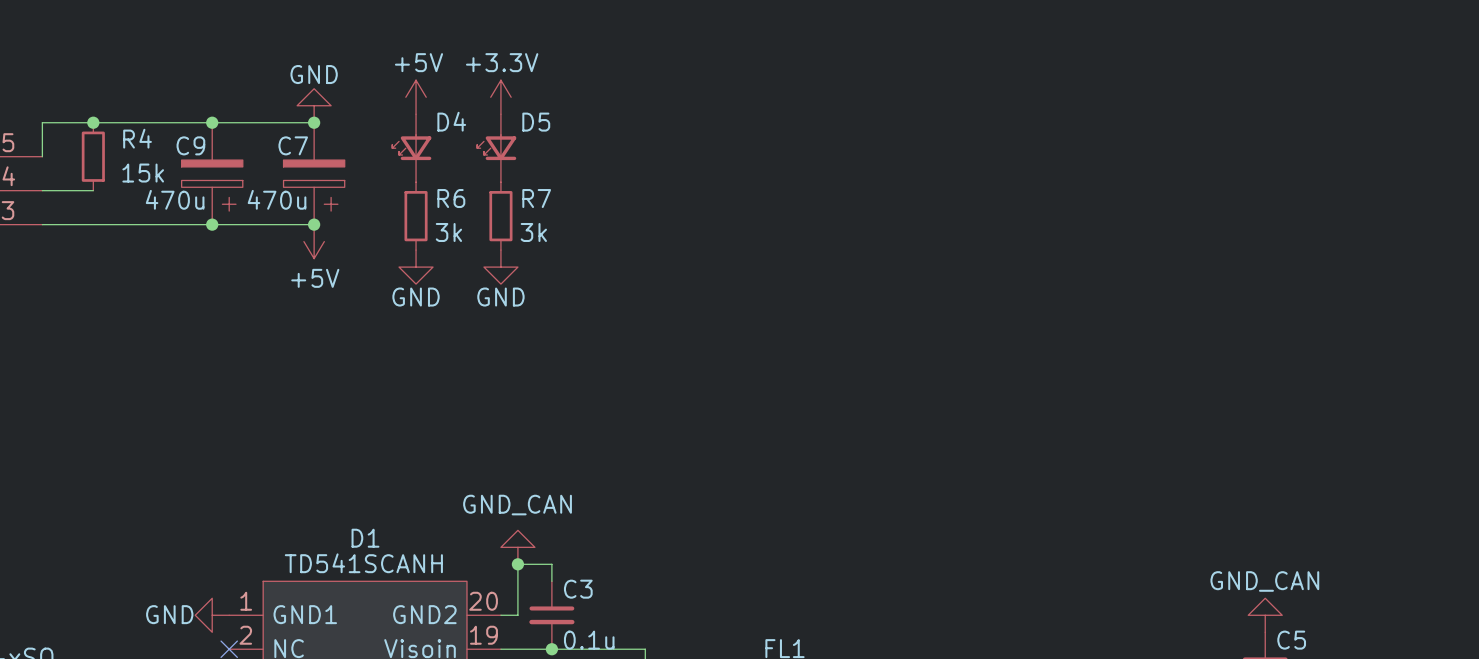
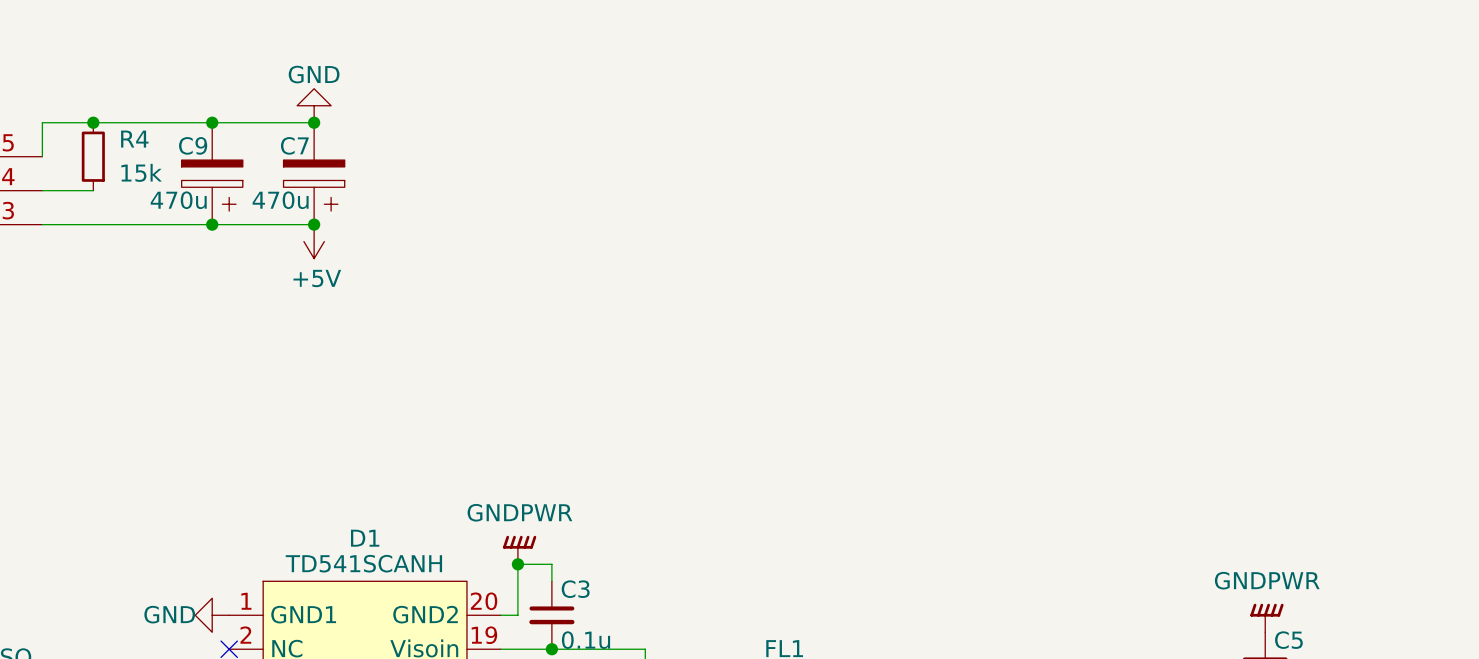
power symbol: +5V (416, 97) -> none
power symbol: +3.3V (500, 97) -> none
D4: (411, 148) -> none
D5: (496, 148) -> none
R6: 3k (416, 216) -> none
R7: 3k (500, 216) -> none
power symbol: GND (416, 267) -> none
power symbol: GND (500, 267) -> none
power symbol: GND_CAN (517, 547) -> GNDPWR (519, 550)
power symbol: GND_CAN (1265, 615) -> GNDPWR (1266, 617)

